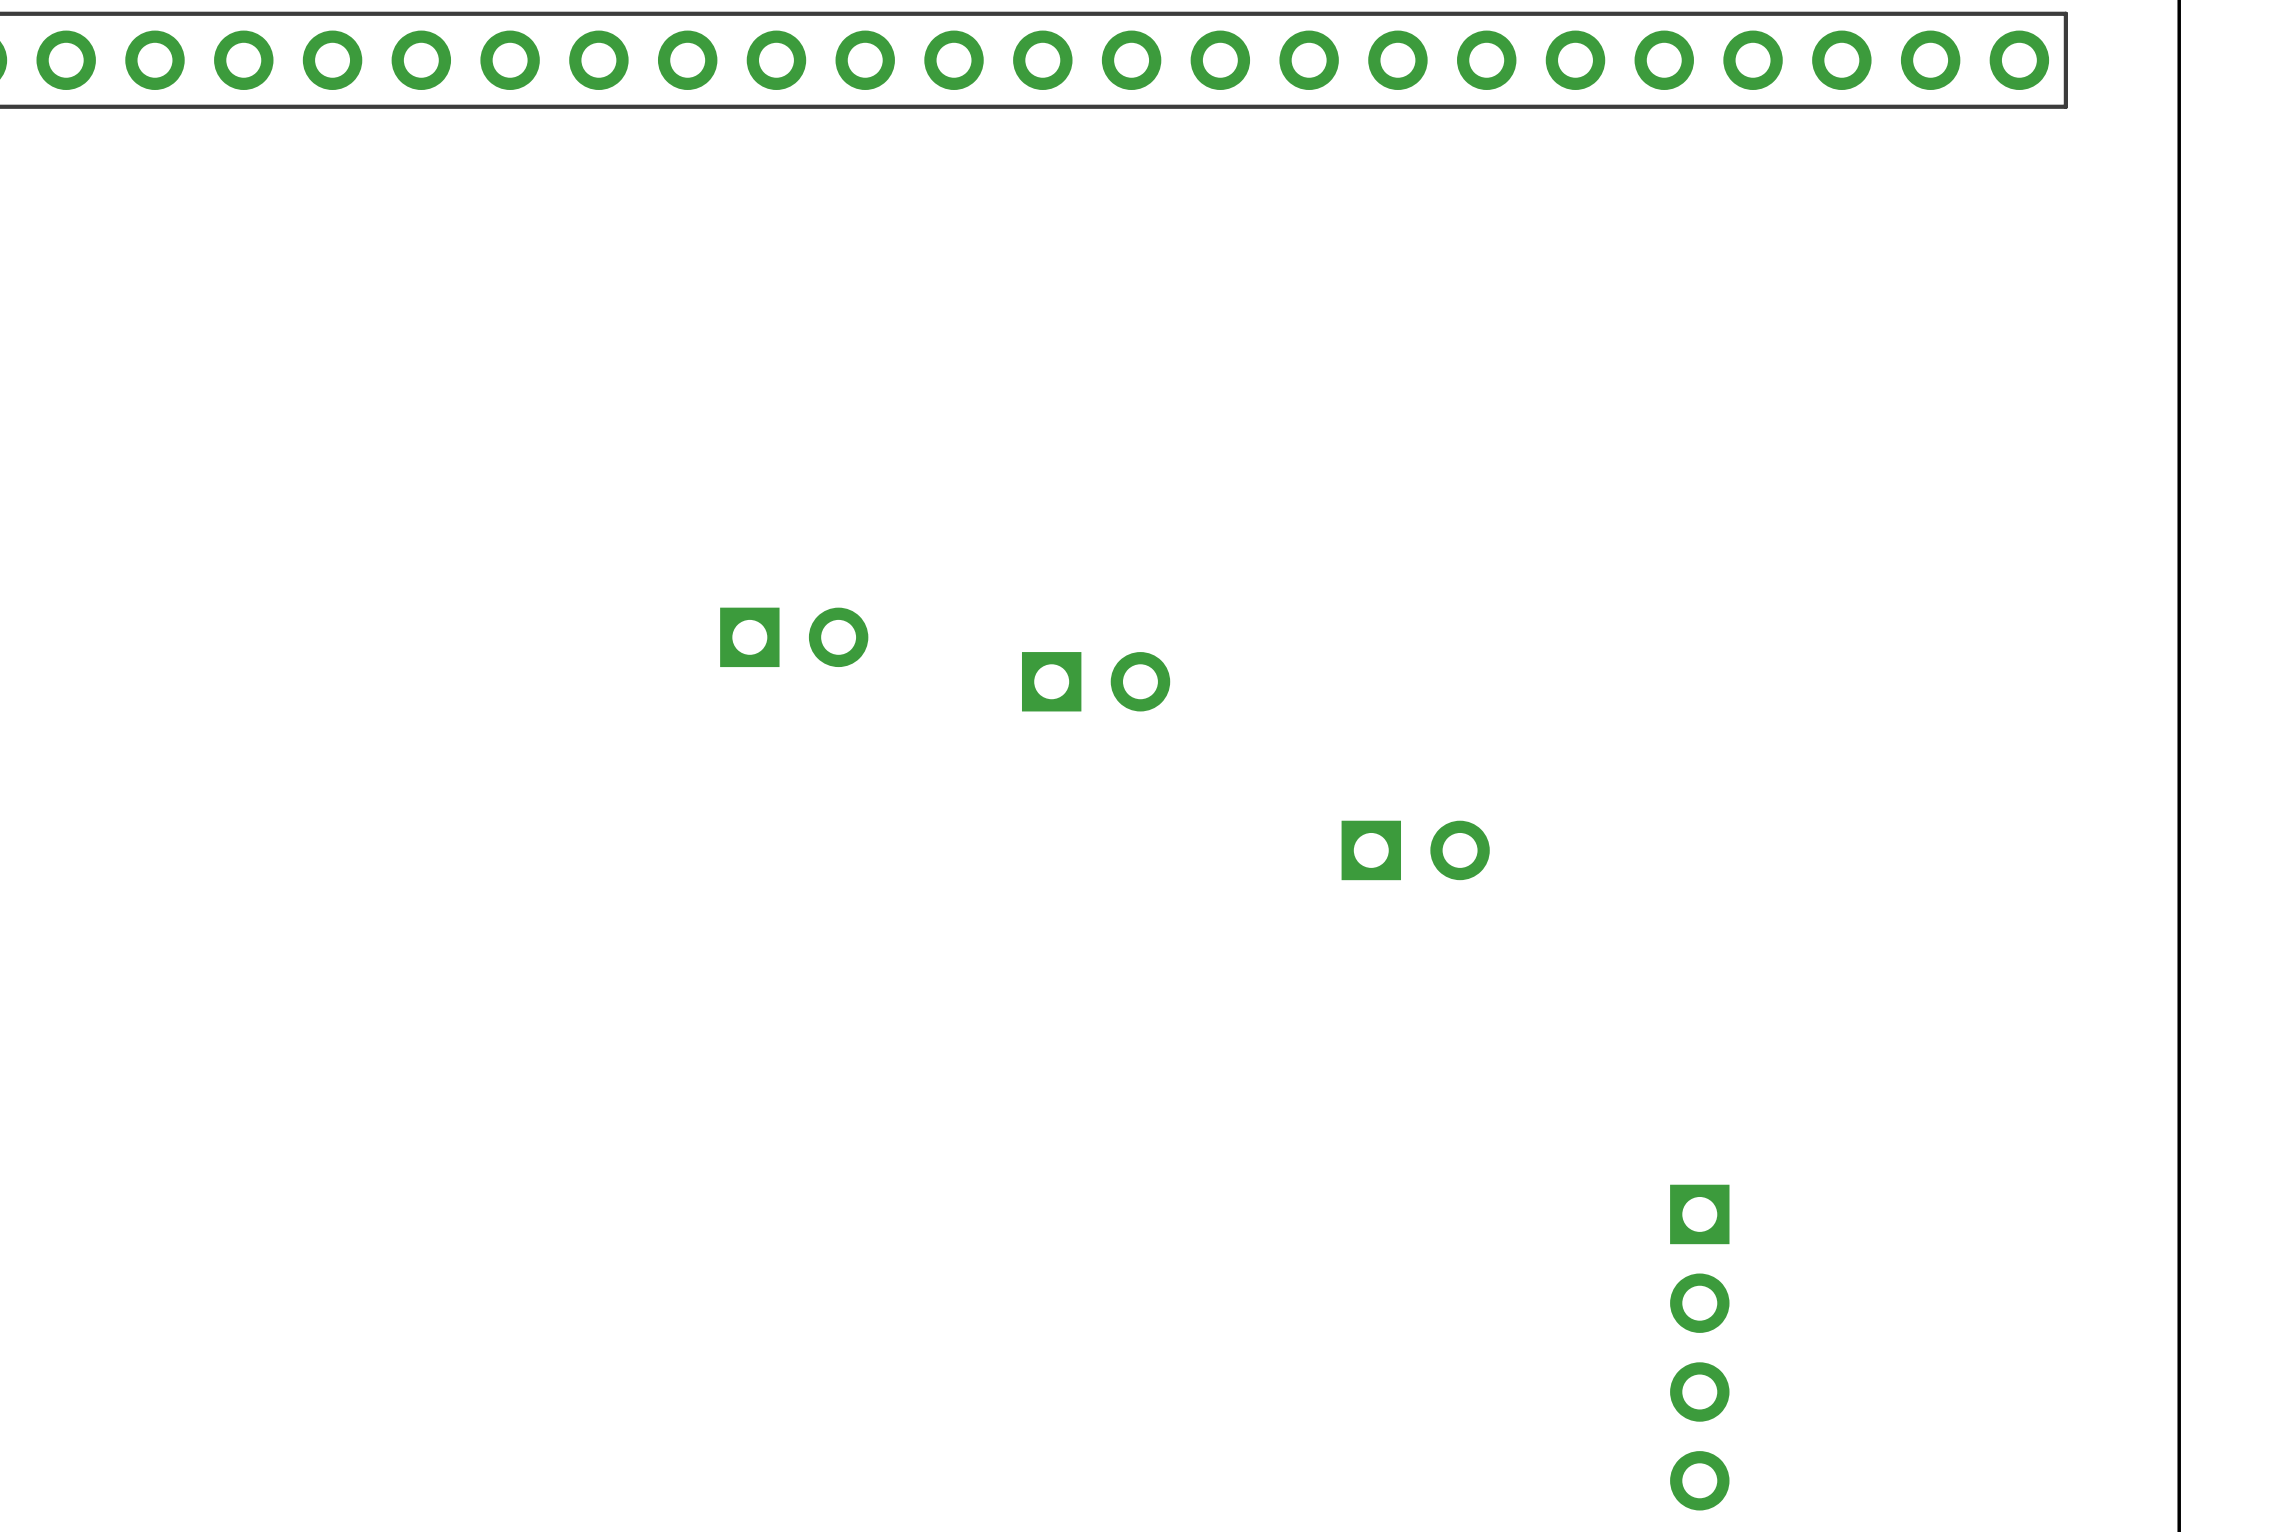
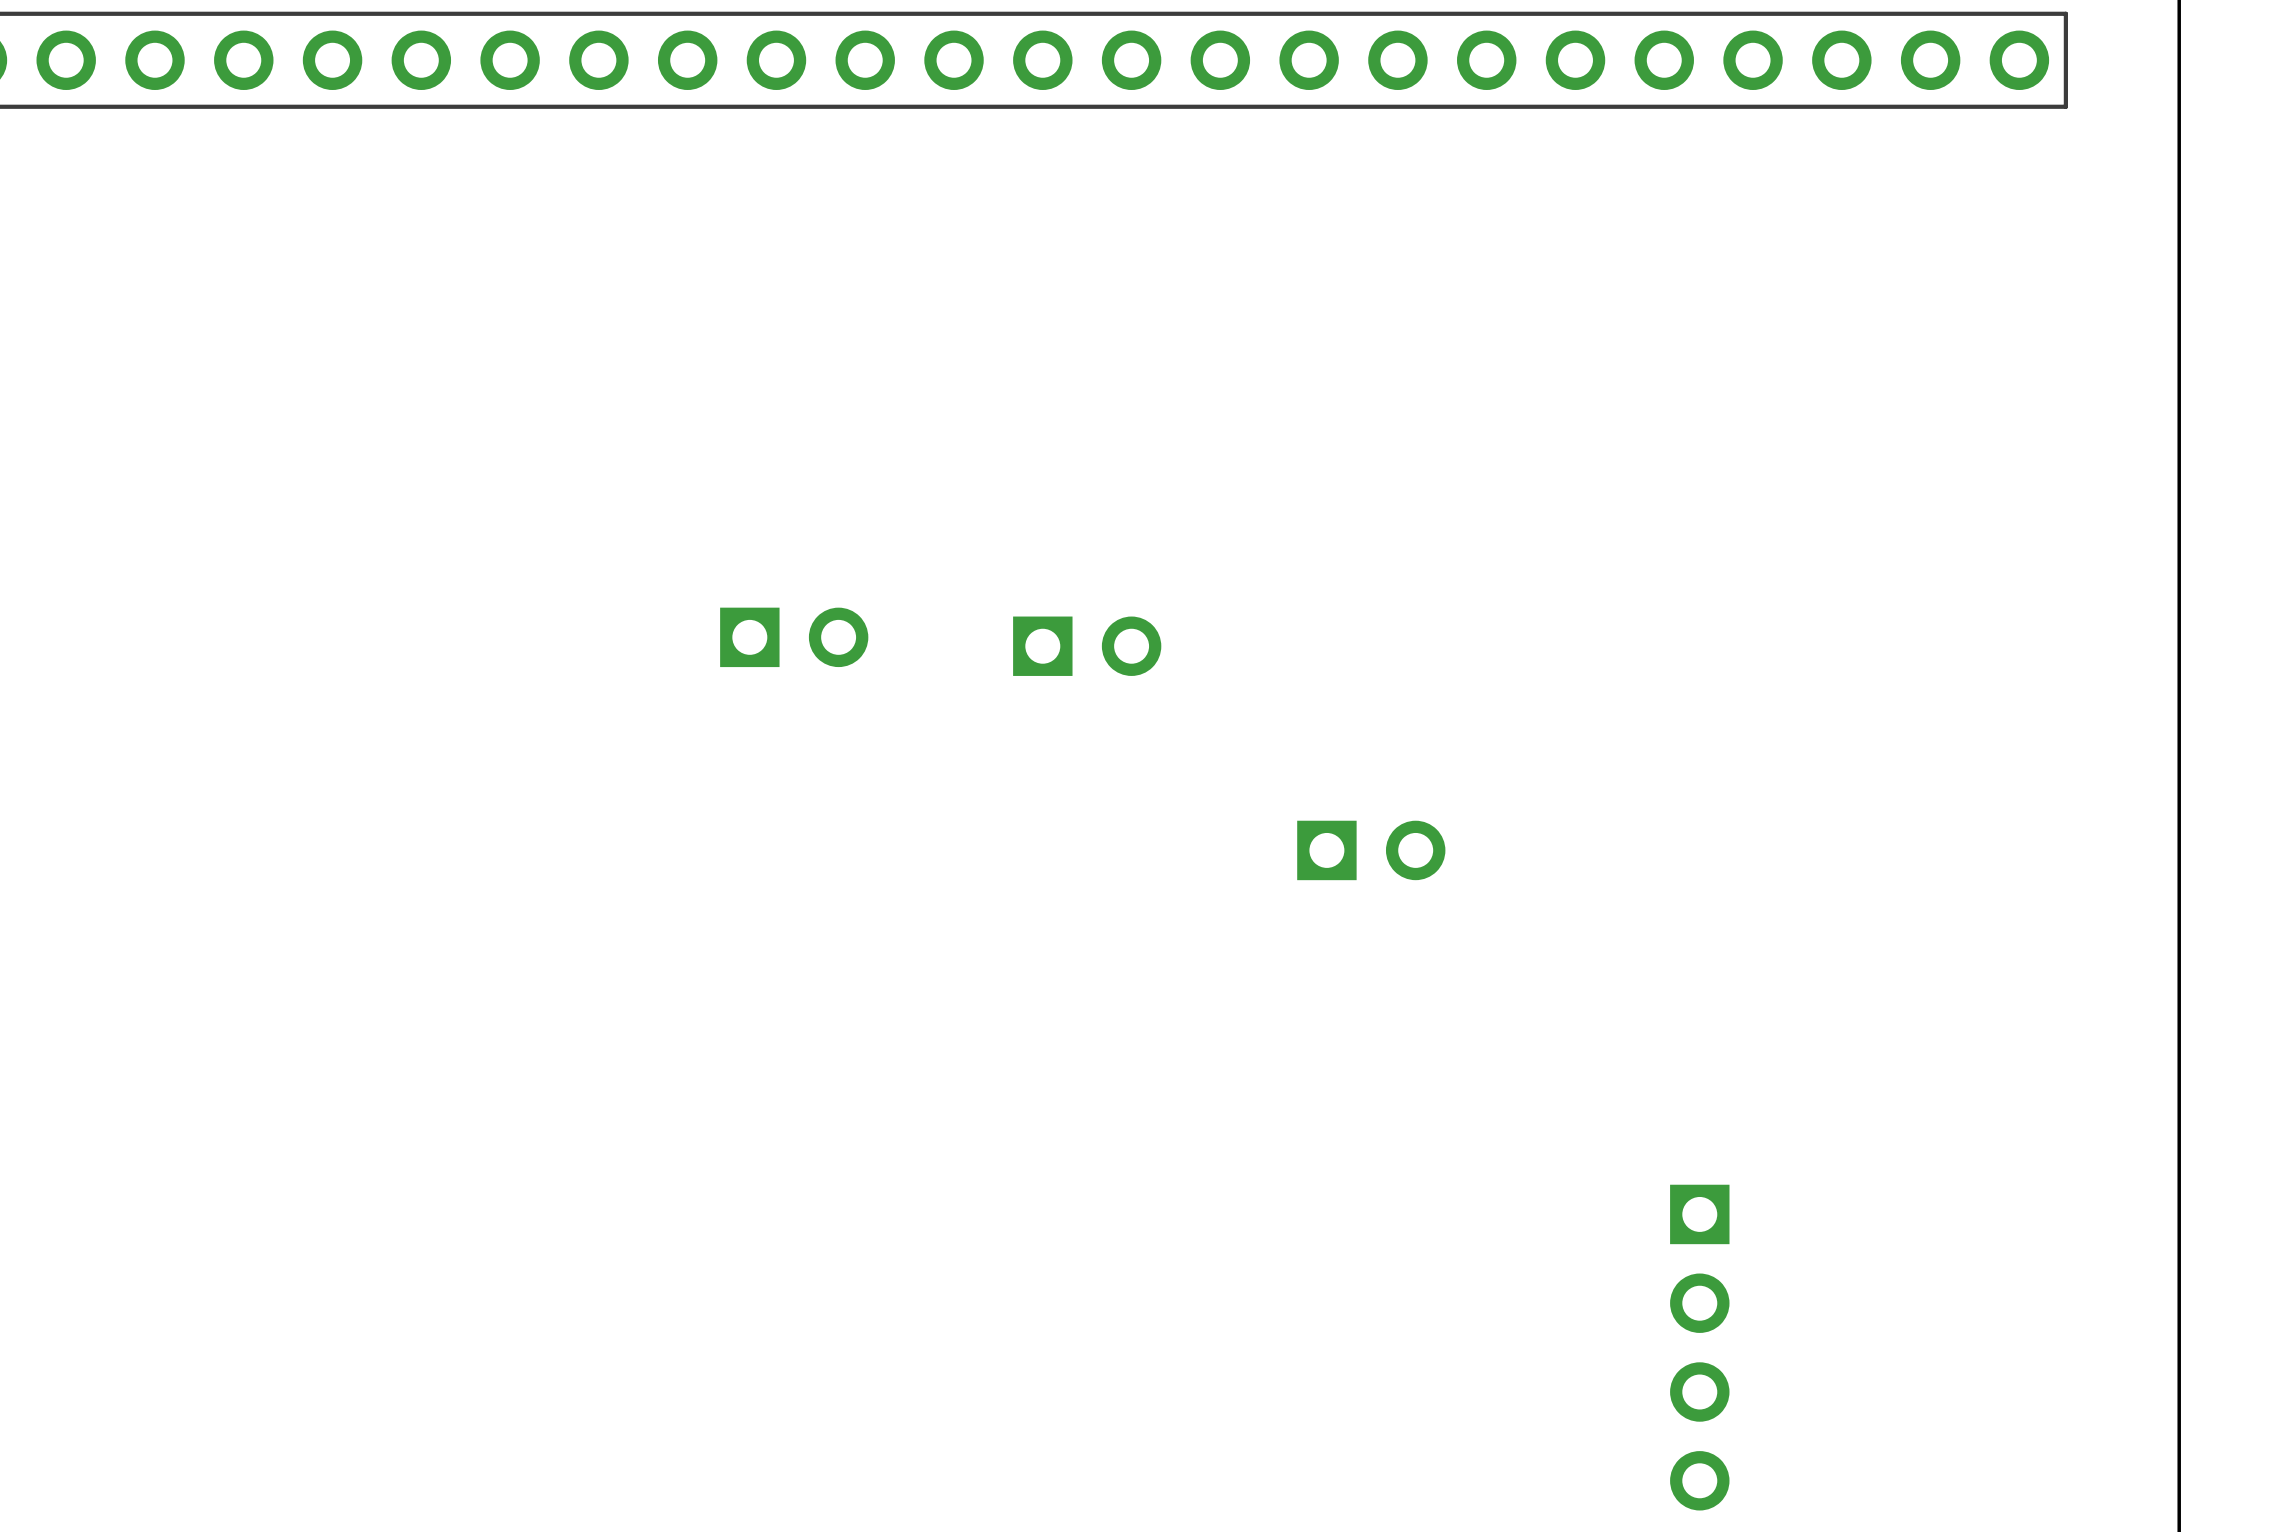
part position: (1096, 681) -> (1087, 646)
part position: (1415, 850) -> (1371, 850)

